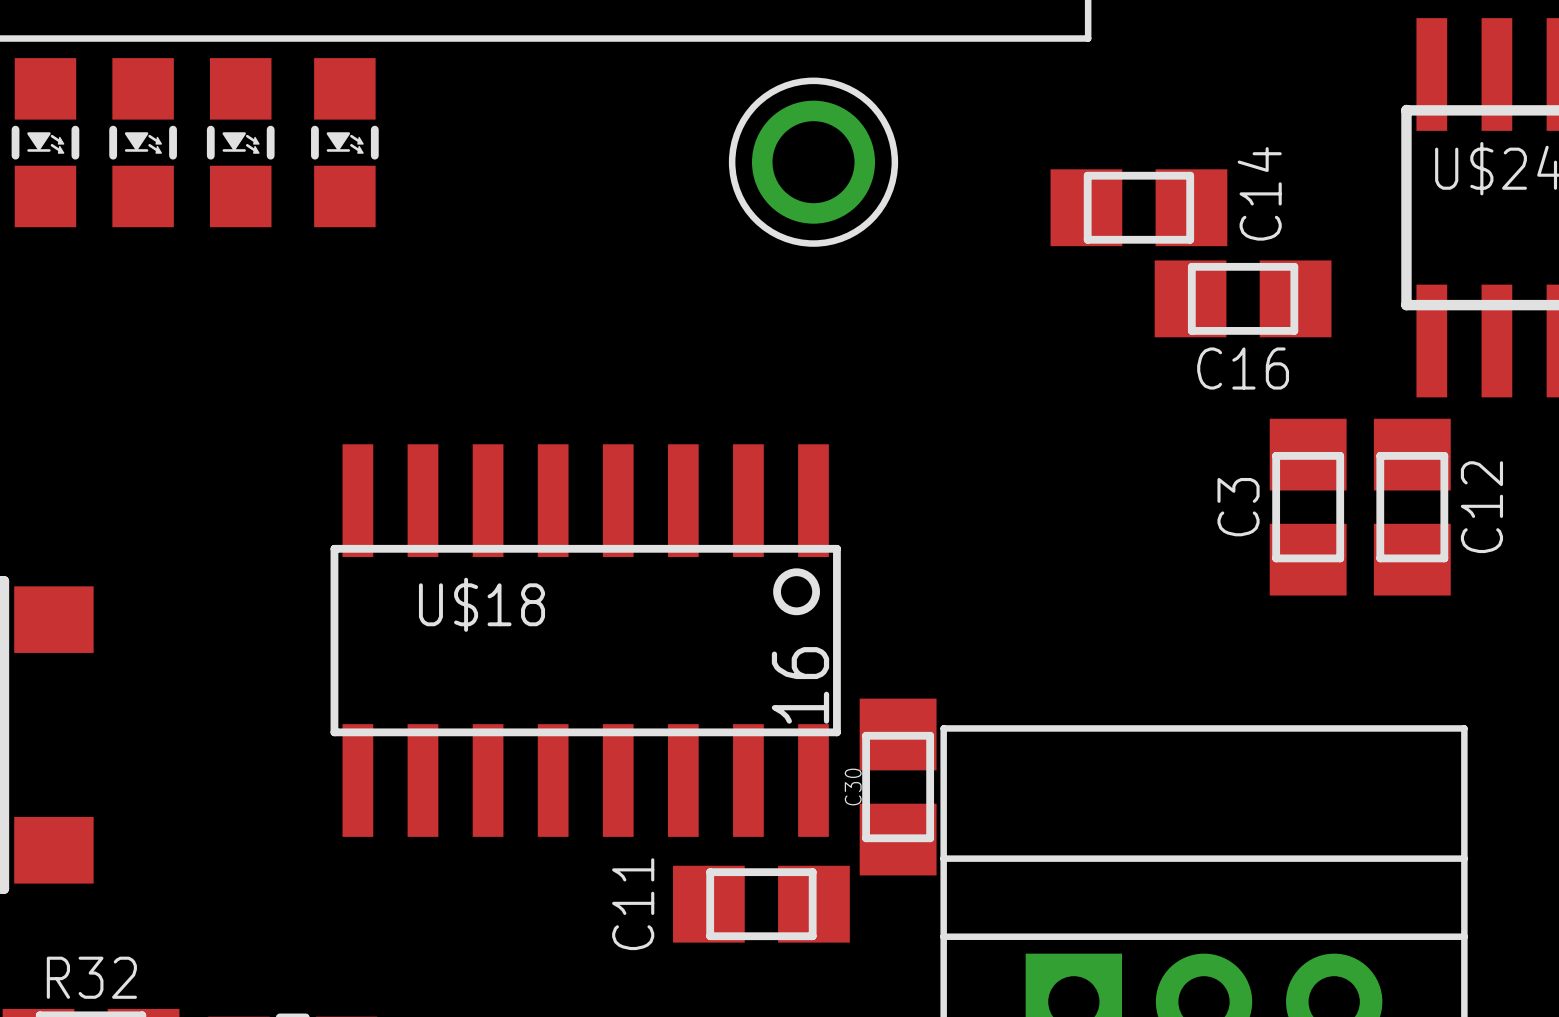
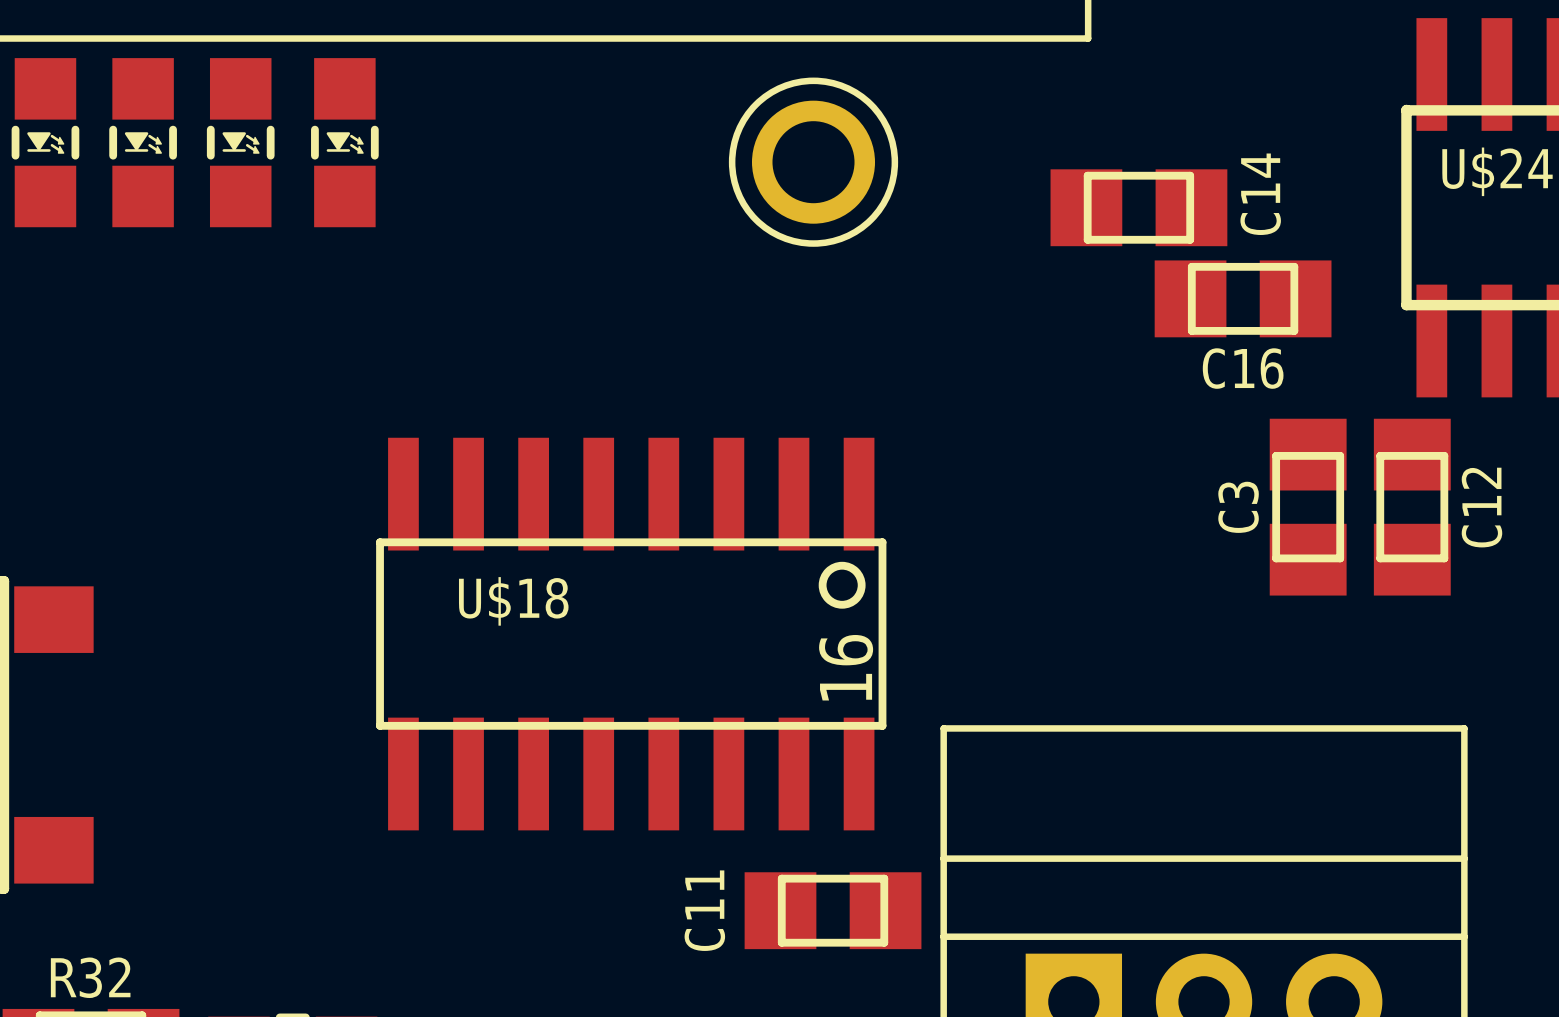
U$18 position: (585, 640) -> (631, 634)
C30: (898, 787) -> none
C11 position: (761, 904) -> (833, 910)

